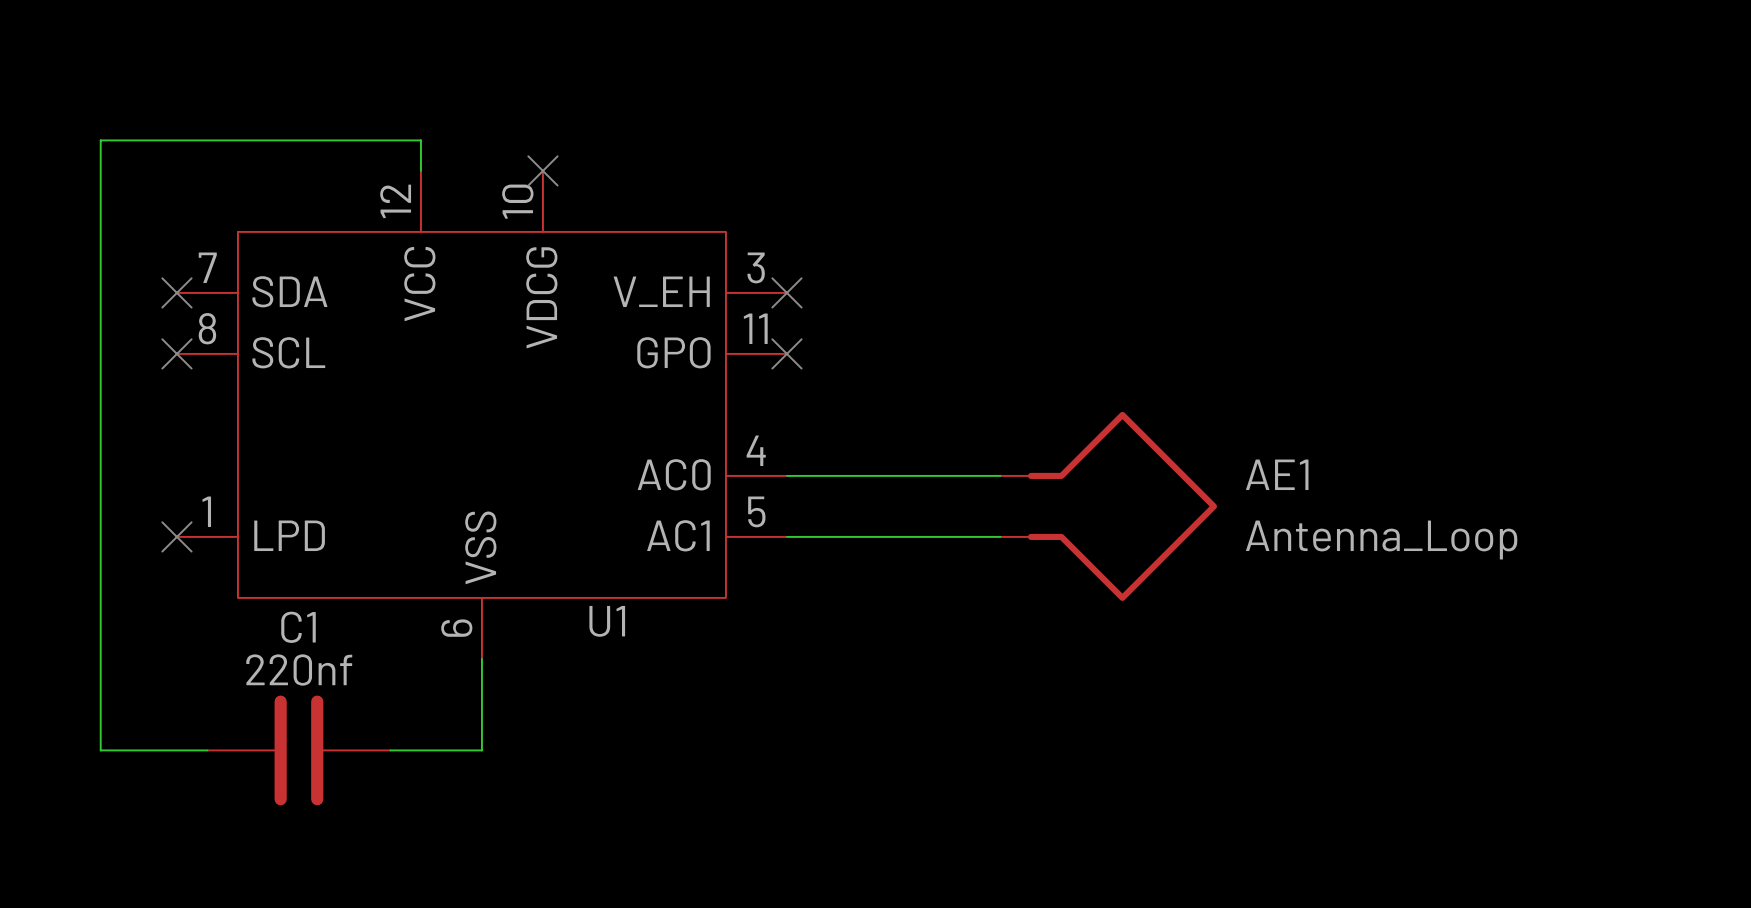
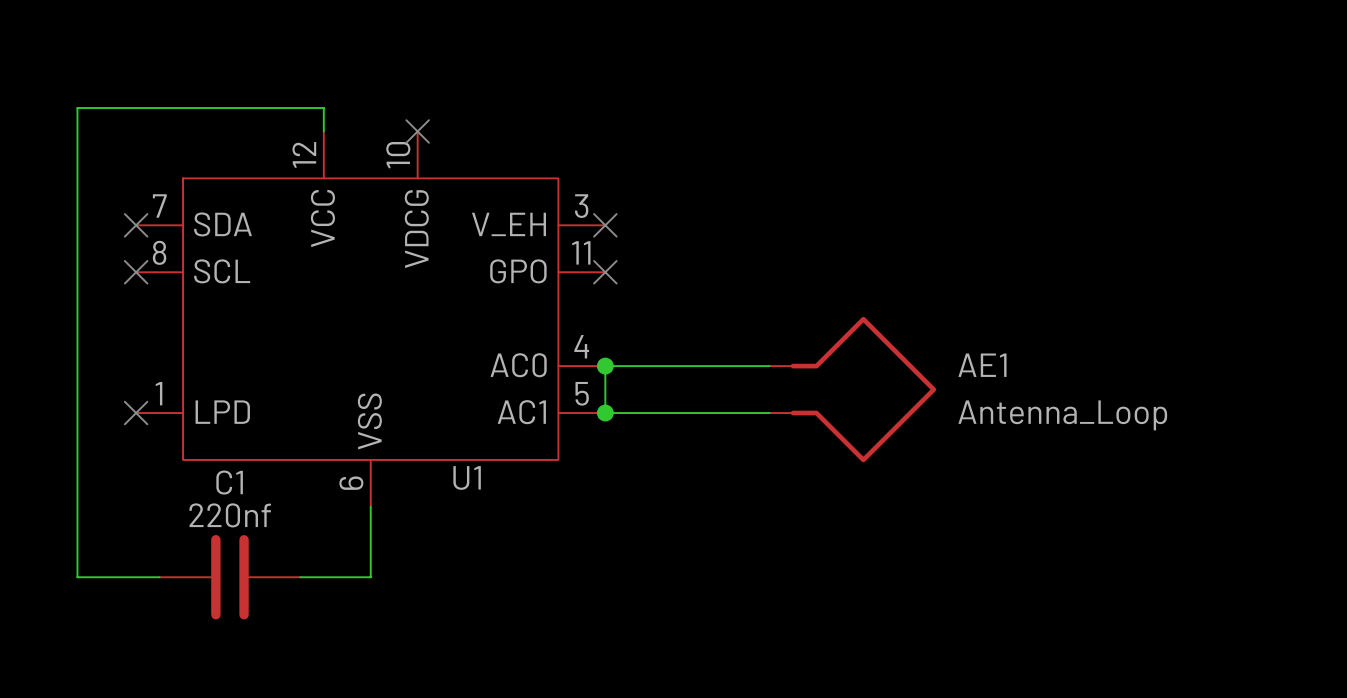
wire: none -> (605, 366) (605, 413)
junction: none -> (605, 366)
junction: none -> (605, 413)

